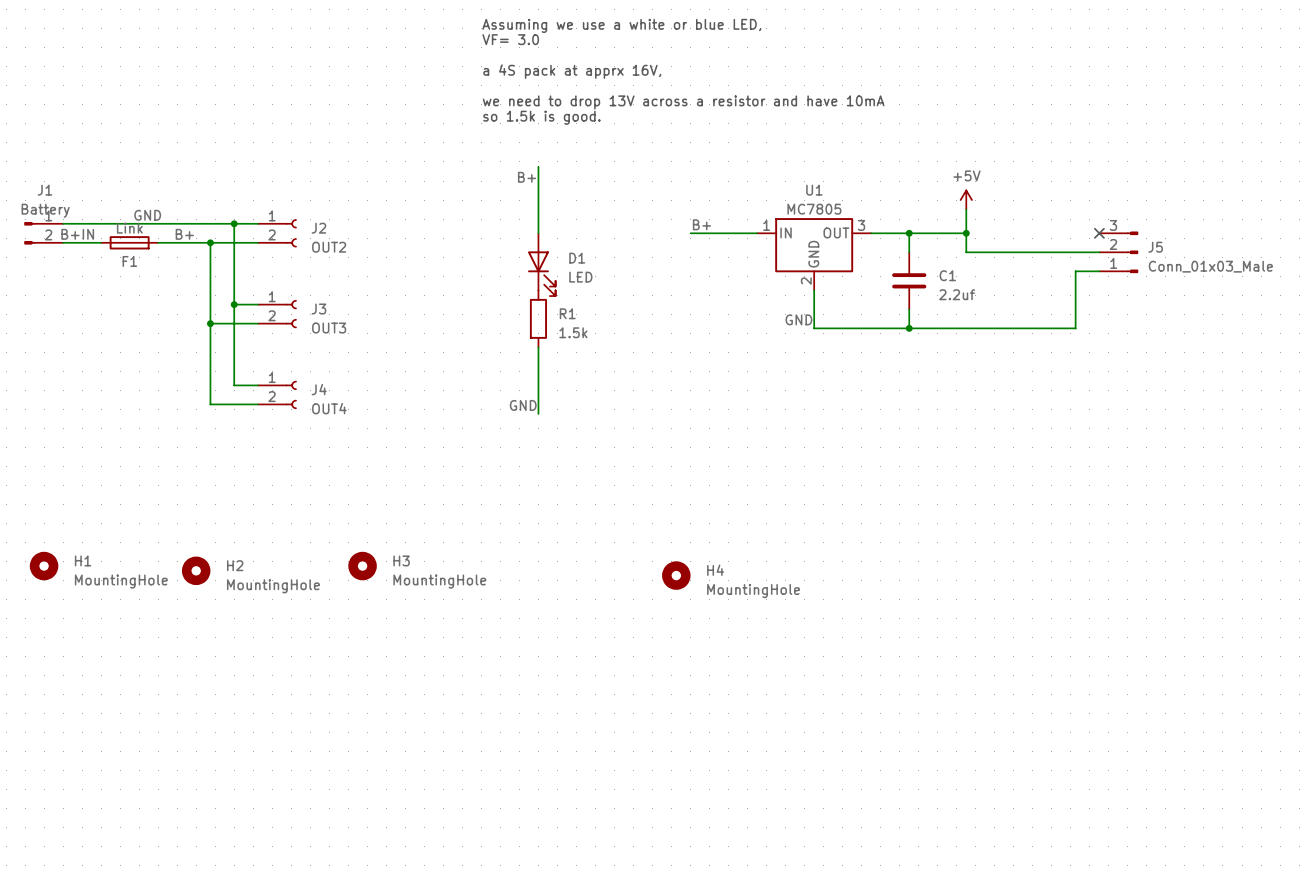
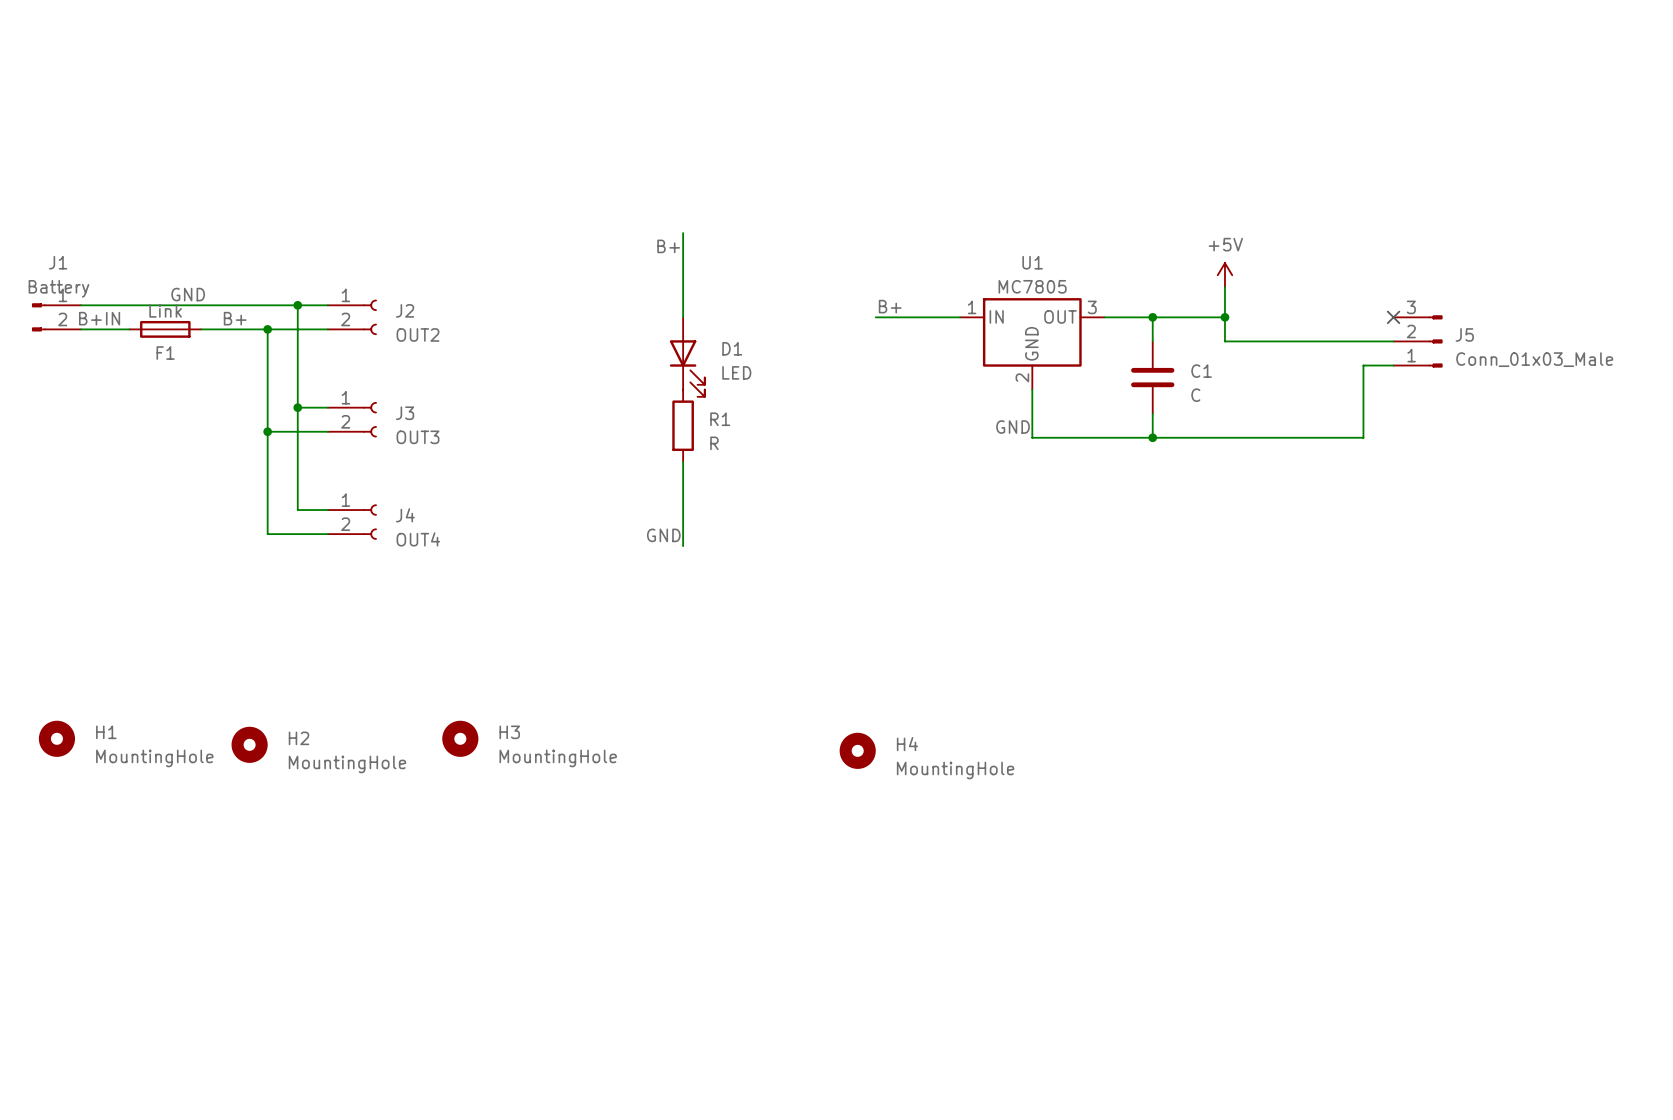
text: Assuming we use a white or blue LED, (621, 25) -> none
text: VF= 3.0 (510, 39) -> none
text: a 4S pack at apprx 16V, (572, 71) -> none
text: we need to drop 13V across a resistor and have 10mA (683, 102) -> none
text: so 1.5k is good. (541, 117) -> none
C1 value: 2.2uf (957, 294) -> C (1195, 395)
R1 value: 1.5k (573, 332) -> R (714, 443)

